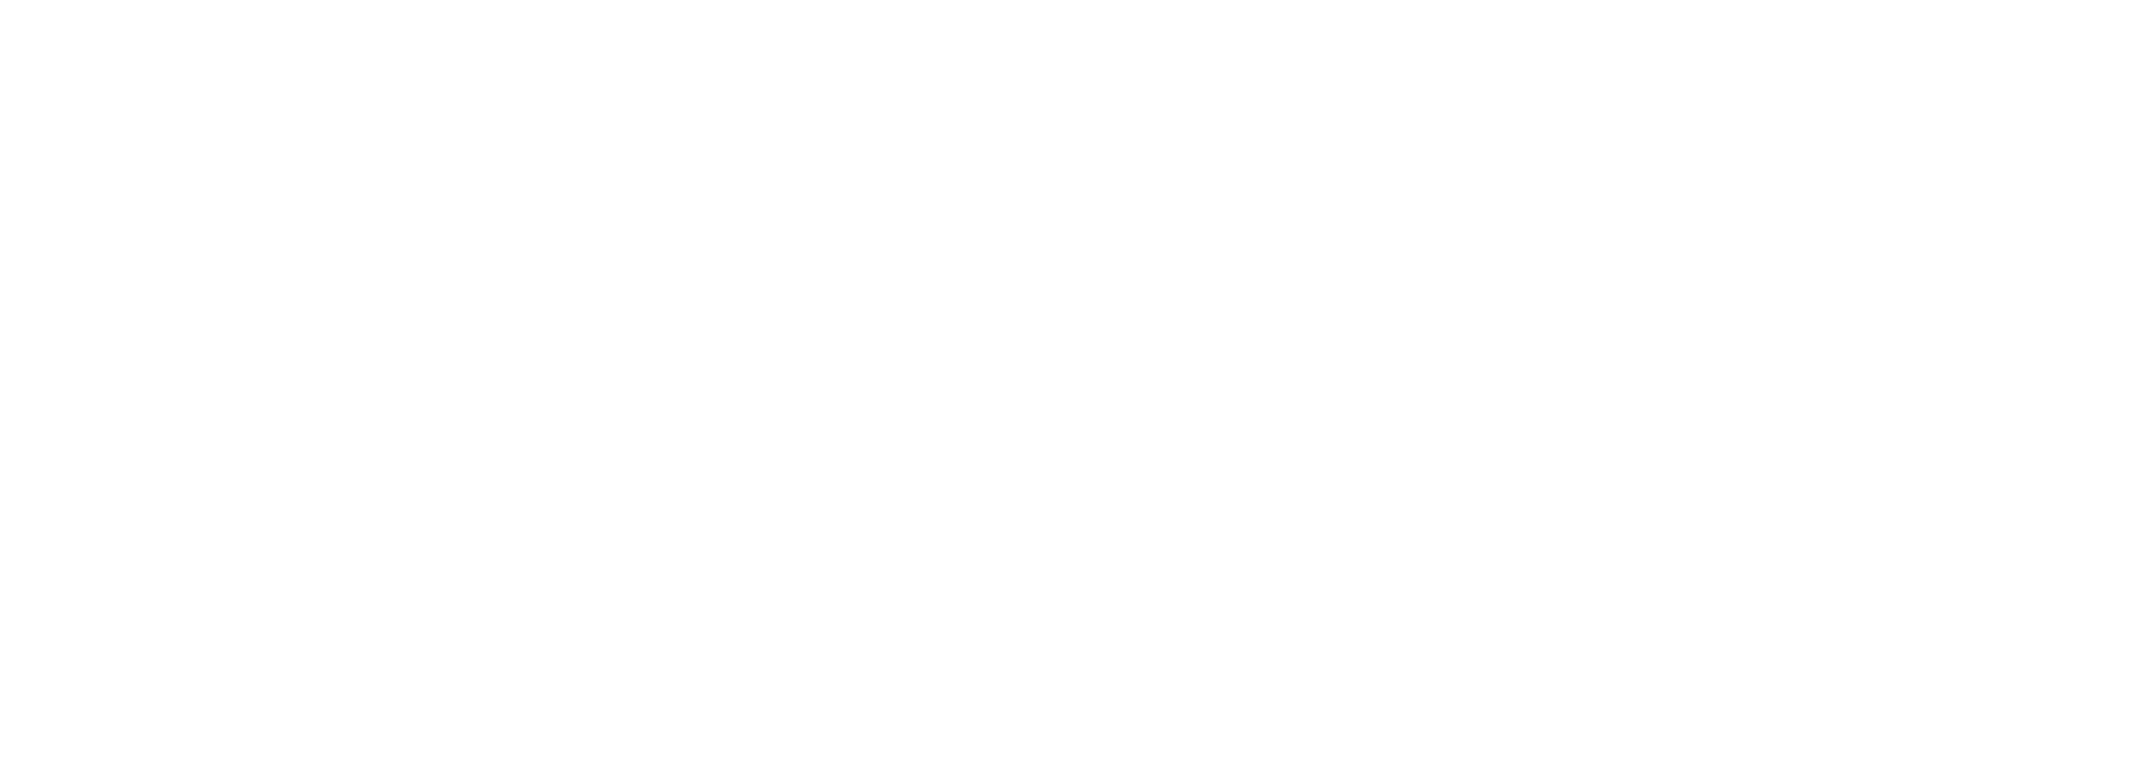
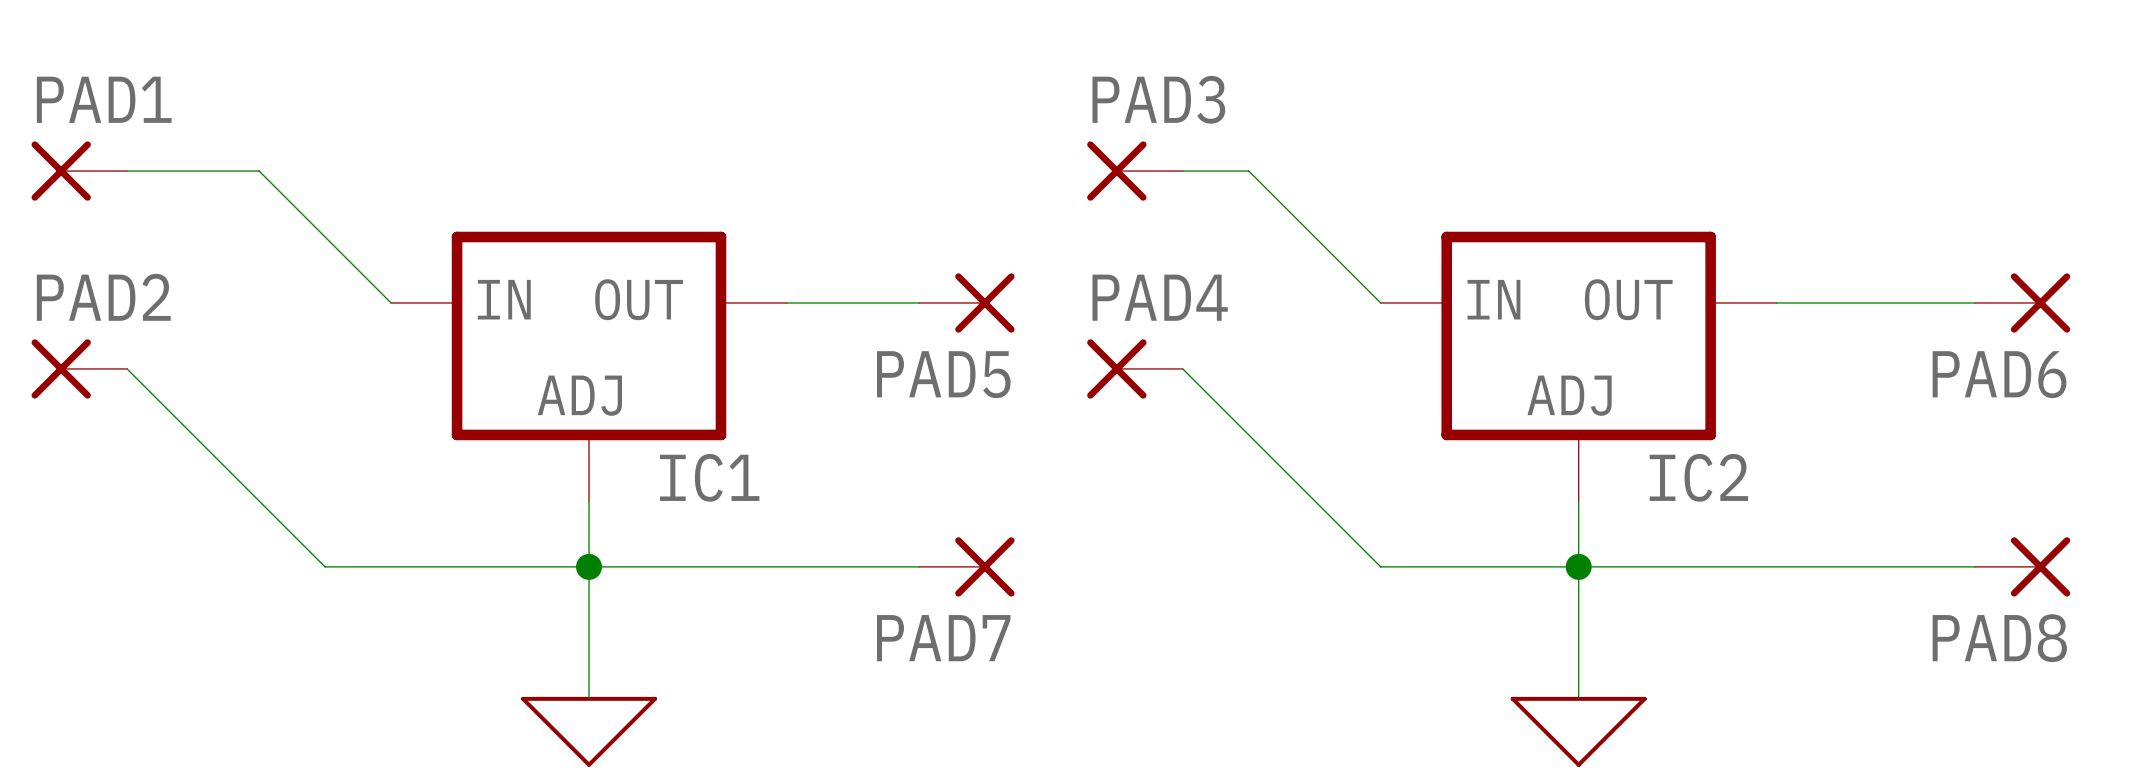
PAD1: none -> (79, 171)
wire: none -> (127, 171) (259, 171) (391, 302)
PAD3: none -> (1134, 171)
wire: none -> (1182, 171) (1248, 171) (1380, 302)
wire: none -> (786, 302) (918, 302)
PAD5: none -> (966, 302)
wire: none -> (1776, 302) (1974, 302)
PAD6: none -> (2022, 302)
IC1: none -> (589, 366)
IC2: none -> (1578, 366)
PAD2: none -> (79, 368)
wire: none -> (127, 368) (325, 566) (918, 566)
PAD4: none -> (1134, 368)
wire: none -> (1182, 368) (1380, 566) (1974, 566)
wire: none -> (589, 500) (589, 698)
wire: none -> (1578, 500) (1578, 698)
junction: none -> (589, 566)
PAD7: none -> (966, 566)
junction: none -> (1578, 566)
PAD8: none -> (2022, 566)
power symbol: none -> (589, 731)
power symbol: none -> (1578, 731)

